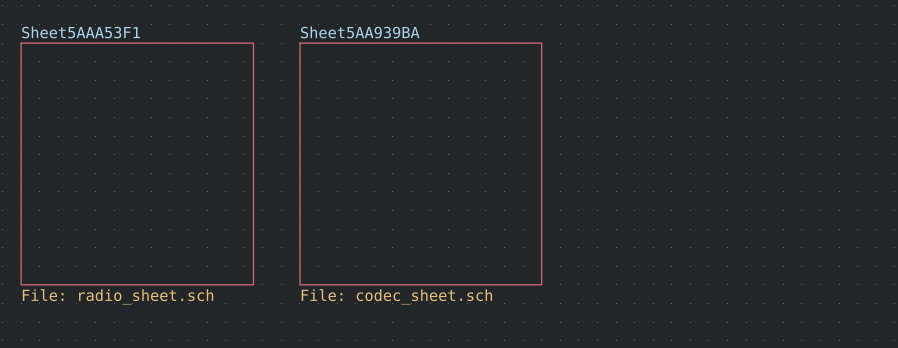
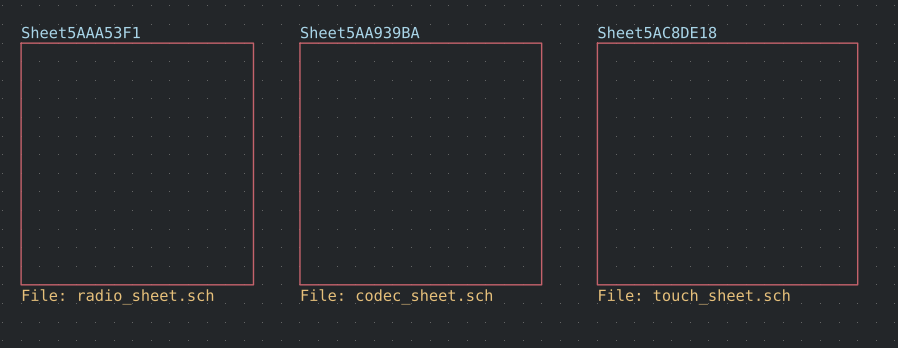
sheet Sheet5AC8DE18: none -> File: touch_sheet.sch (727, 163)

